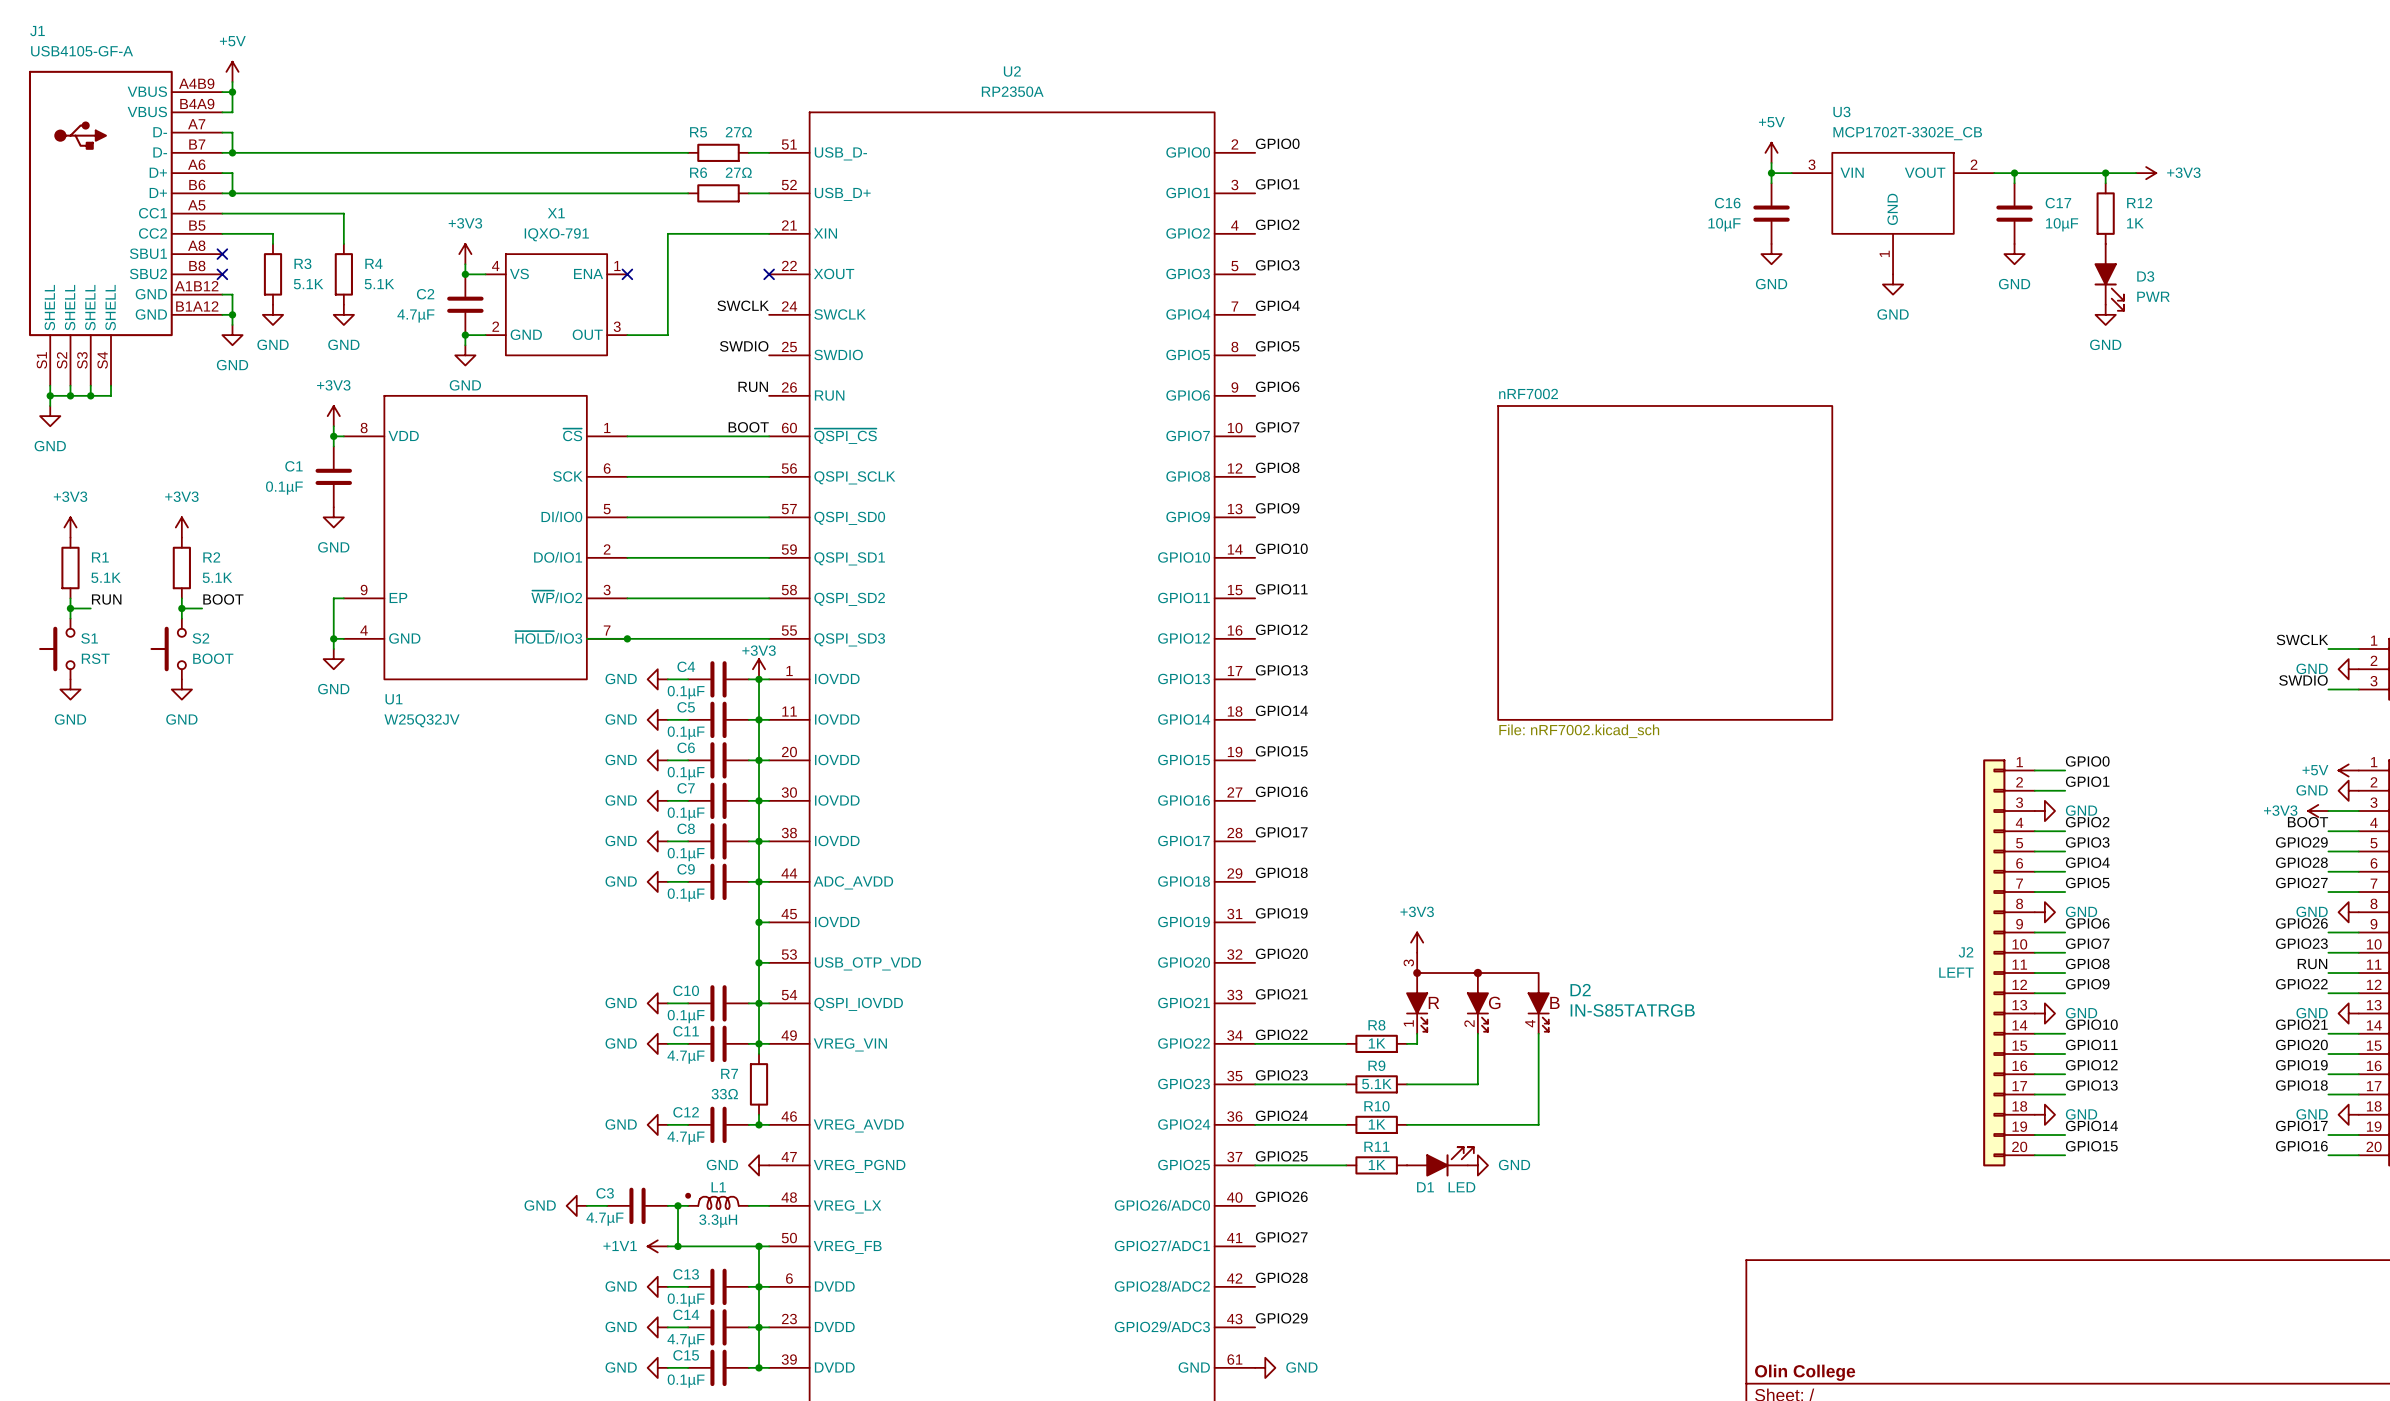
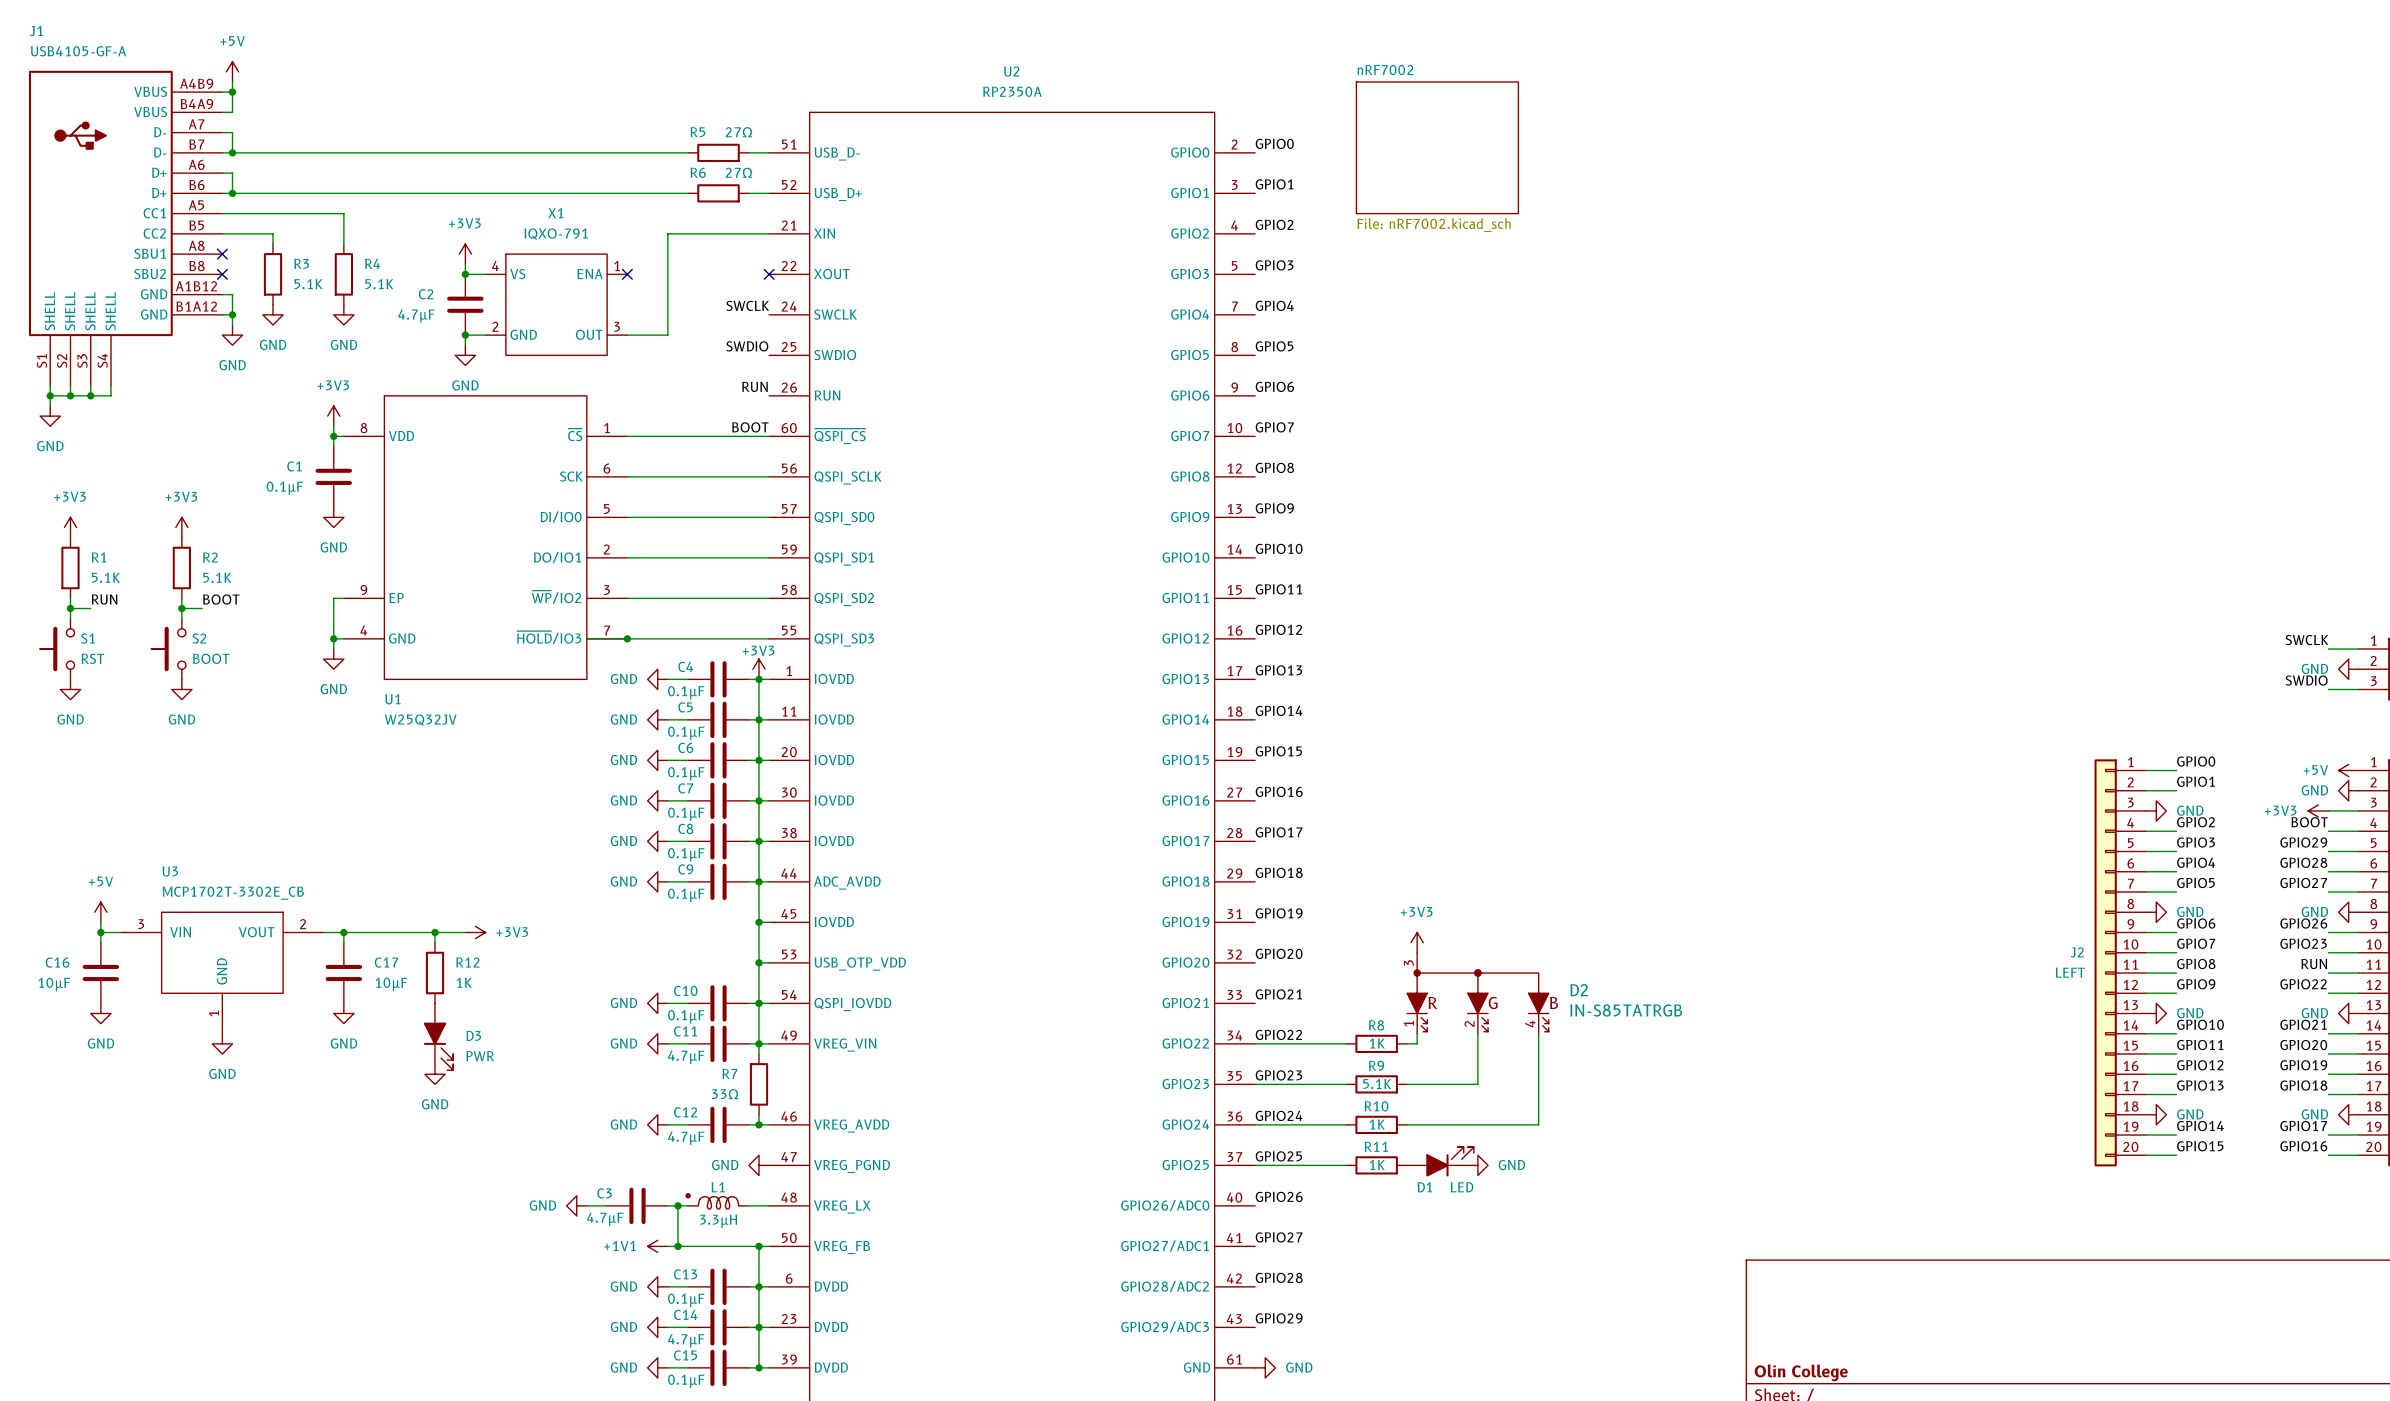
power symbol: +5V (1771, 152) -> none
wire: (1771, 162) (1771, 183) -> none
wire: (1771, 173) (1791, 173) -> none
junction: (1771, 173) -> none
wire: (1994, 173) (2136, 173) -> none
wire: (2014, 173) (2014, 183) -> none
junction: (2014, 173) -> none
wire: (2105, 173) (2105, 183) -> none
junction: (2105, 173) -> none
power symbol: +3V3 (2146, 173) -> none
C16 position: (1771, 213) -> (100, 973)
U3 position: (1893, 213) -> (222, 973)
C17 position: (2014, 213) -> (343, 973)
R12 position: (2105, 213) -> (435, 973)
power symbol: GND (1771, 254) -> none
power symbol: GND (2014, 254) -> none
D3 position: (2109, 277) -> (438, 1036)
power symbol: GND (1893, 284) -> none
power symbol: GND (2105, 314) -> none
sheet nRF7002 name position: nRF7002 (1528, 394) -> nRF7002 (1385, 70)
sheet nRF7002 shape: [1497, 405, 1833, 721] -> [1355, 81, 1520, 215]
sheet nRF7002 value position: File: nRF7002.kicad_sch (1579, 731) -> File: nRF7002.kicad_sch (1434, 225)
label position: GPIO0 (2087, 761) -> GPIO0 (2196, 761)
wire: (2034, 770) (2065, 770) -> (2146, 770) (2176, 770)
label position: GPIO1 (2087, 781) -> GPIO1 (2195, 781)
wire: (2034, 790) (2065, 790) -> (2146, 790) (2176, 790)
power symbol: GND (2044, 811) -> none
power symbol: none -> GND (2156, 811)
label position: GPIO2 (2087, 822) -> GPIO2 (2196, 822)
wire: (2034, 831) (2065, 831) -> (2146, 831) (2176, 831)
label position: GPIO3 (2087, 842) -> GPIO3 (2196, 842)
wire: (2034, 851) (2065, 851) -> (2146, 851) (2176, 851)
label position: GPIO4 (2087, 862) -> GPIO4 (2196, 862)
wire: (2034, 871) (2065, 871) -> (2146, 871) (2176, 871)
label position: GPIO5 (2087, 882) -> GPIO5 (2195, 883)
wire: (2034, 892) (2065, 892) -> (2146, 892) (2176, 892)
power symbol: none -> +5V (100, 912)
power symbol: GND (2044, 912) -> none
power symbol: none -> GND (2156, 912)
wire: none -> (100, 922) (100, 942)
label position: GPIO6 (2087, 923) -> GPIO6 (2196, 923)
wire: none -> (100, 932) (121, 932)
junction: none -> (100, 932)
wire: none -> (323, 932) (465, 932)
wire: none -> (343, 932) (343, 942)
junction: none -> (343, 932)
wire: none -> (435, 932) (435, 942)
junction: none -> (435, 932)
power symbol: none -> +3V3 (475, 932)
wire: (2034, 932) (2065, 932) -> (2146, 932) (2176, 932)
label position: GPIO7 (2087, 943) -> GPIO7 (2196, 943)
wire: (2034, 952) (2065, 952) -> (2146, 952) (2176, 952)
J2 position: (2008, 962) -> (2120, 962)
label position: GPIO8 (2087, 963) -> GPIO8 (2196, 964)
wire: (2034, 973) (2065, 973) -> (2146, 973) (2176, 973)
label position: GPIO9 (2087, 984) -> GPIO9 (2196, 984)
wire: (2034, 993) (2065, 993) -> (2146, 993) (2176, 993)
power symbol: none -> GND (100, 1013)
power symbol: none -> GND (343, 1013)
power symbol: GND (2044, 1013) -> none
power symbol: none -> GND (2156, 1013)
label position: GPIO10 (2091, 1024) -> GPIO10 (2200, 1024)
wire: (2034, 1033) (2065, 1033) -> (2146, 1033) (2176, 1033)
power symbol: none -> GND (222, 1043)
label position: GPIO11 (2091, 1044) -> GPIO11 (2200, 1045)
wire: (2034, 1054) (2065, 1054) -> (2146, 1054) (2176, 1054)
label position: GPIO12 (2091, 1065) -> GPIO12 (2200, 1065)
power symbol: none -> GND (435, 1074)
wire: (2034, 1074) (2065, 1074) -> (2146, 1074) (2176, 1074)
label position: GPIO13 (2091, 1085) -> GPIO13 (2200, 1085)
wire: (2034, 1094) (2065, 1094) -> (2146, 1094) (2176, 1094)
power symbol: GND (2044, 1114) -> none
power symbol: none -> GND (2156, 1114)
label position: GPIO14 (2091, 1125) -> GPIO14 (2200, 1126)
wire: (2034, 1135) (2065, 1135) -> (2146, 1135) (2176, 1135)
label position: GPIO15 (2091, 1146) -> GPIO15 (2200, 1146)
wire: (2034, 1155) (2065, 1155) -> (2146, 1155) (2176, 1155)

